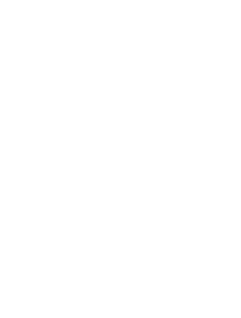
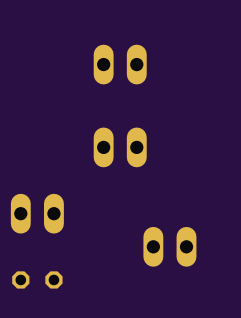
part: none -> (120, 64)
part: none -> (120, 147)
part: none -> (37, 213)
part: none -> (169, 246)
part: none -> (37, 279)

